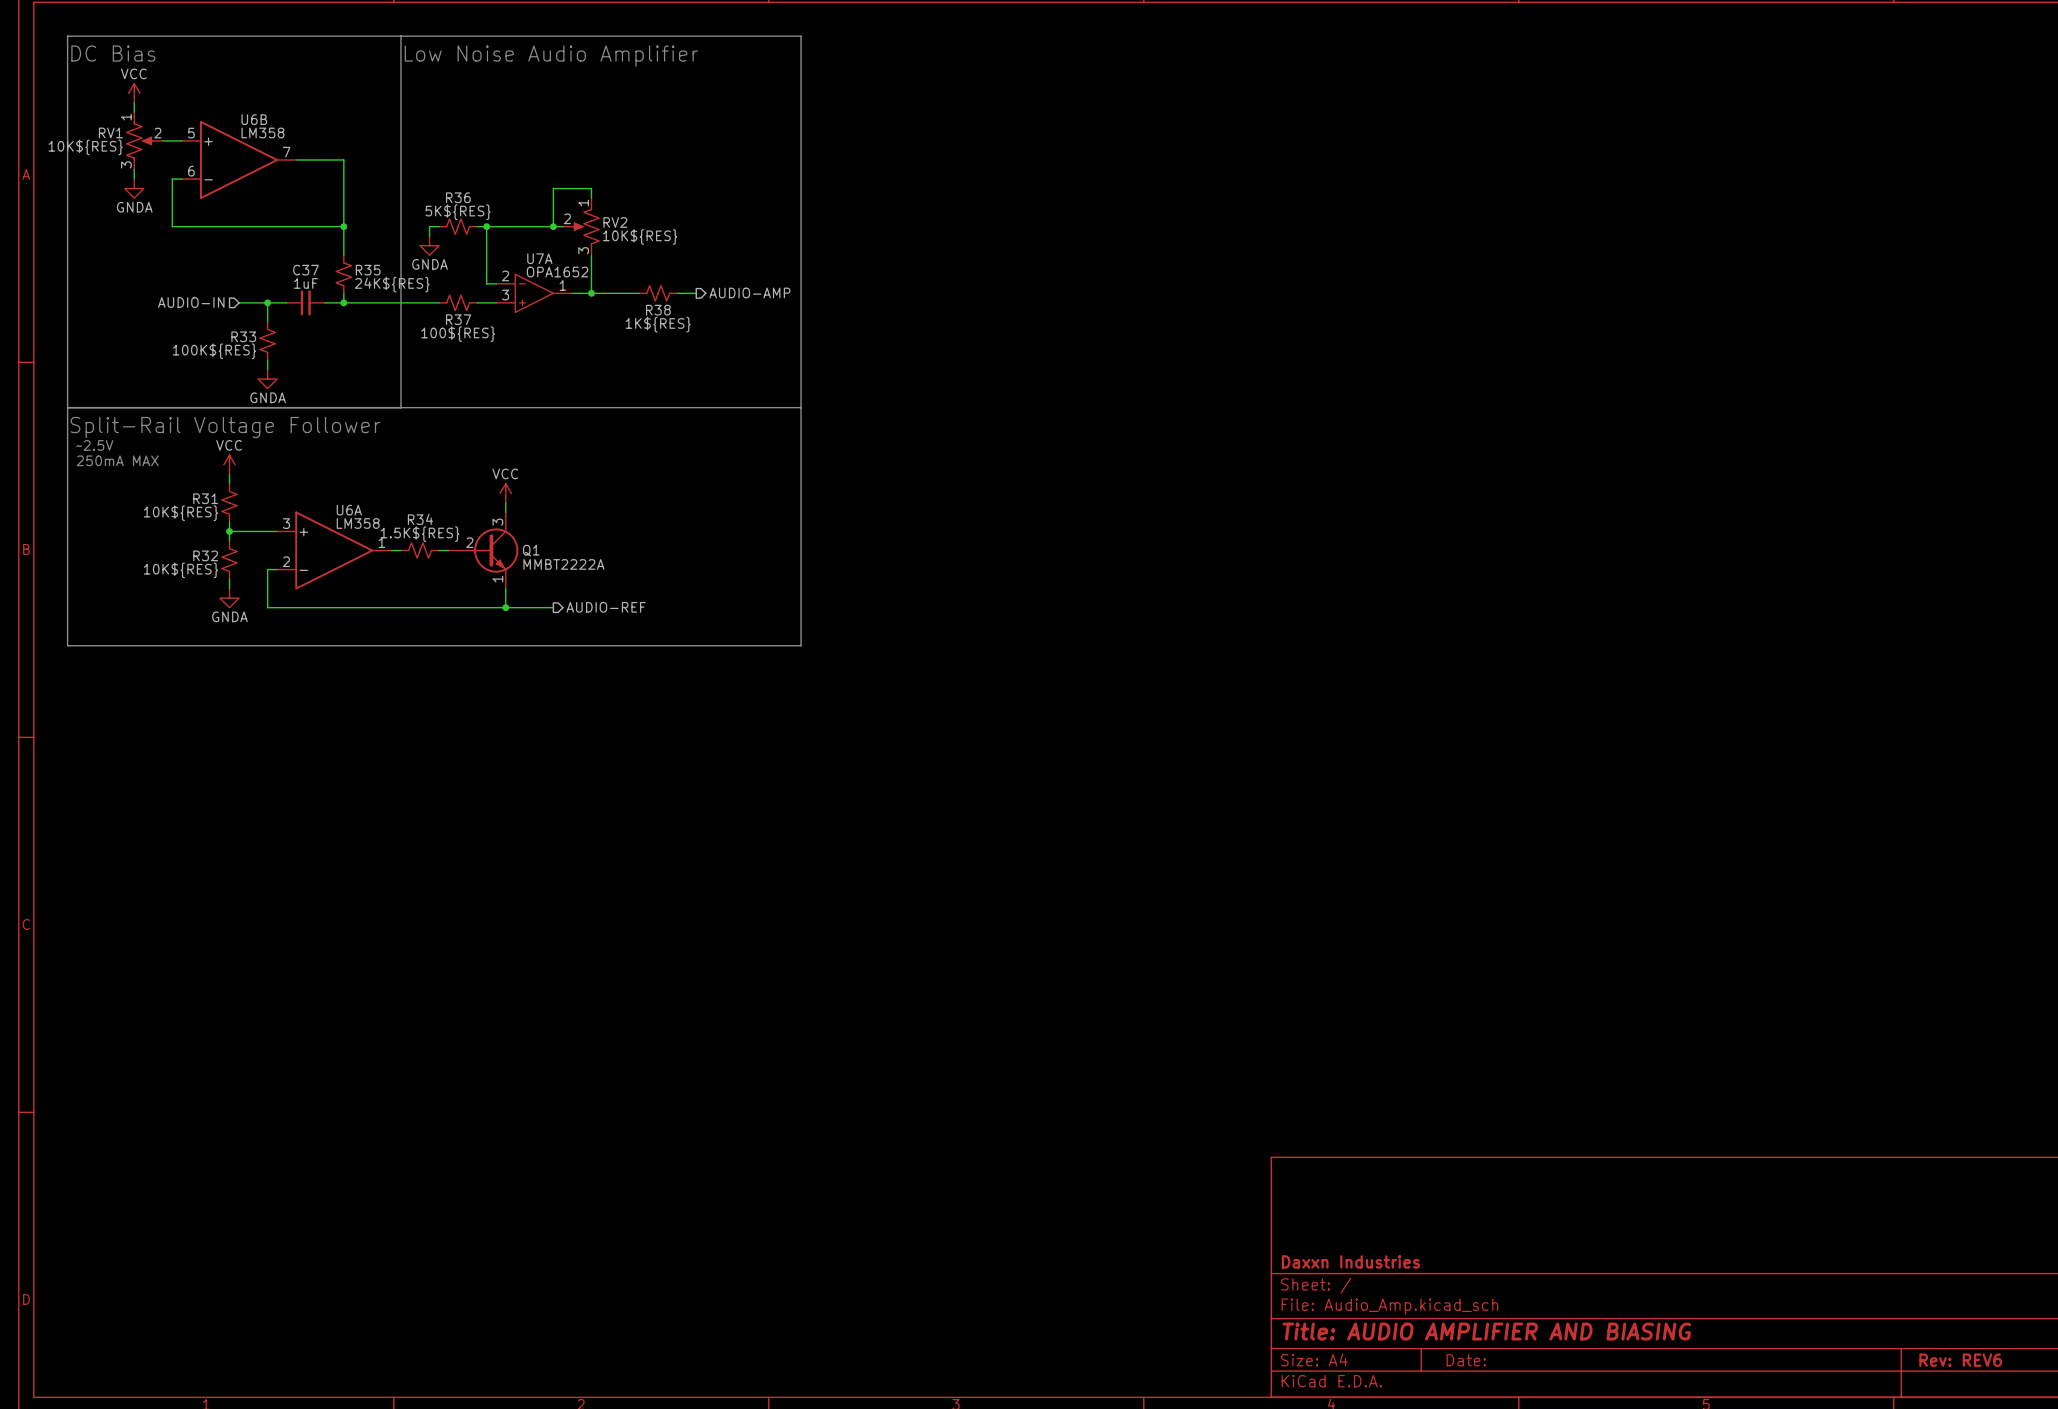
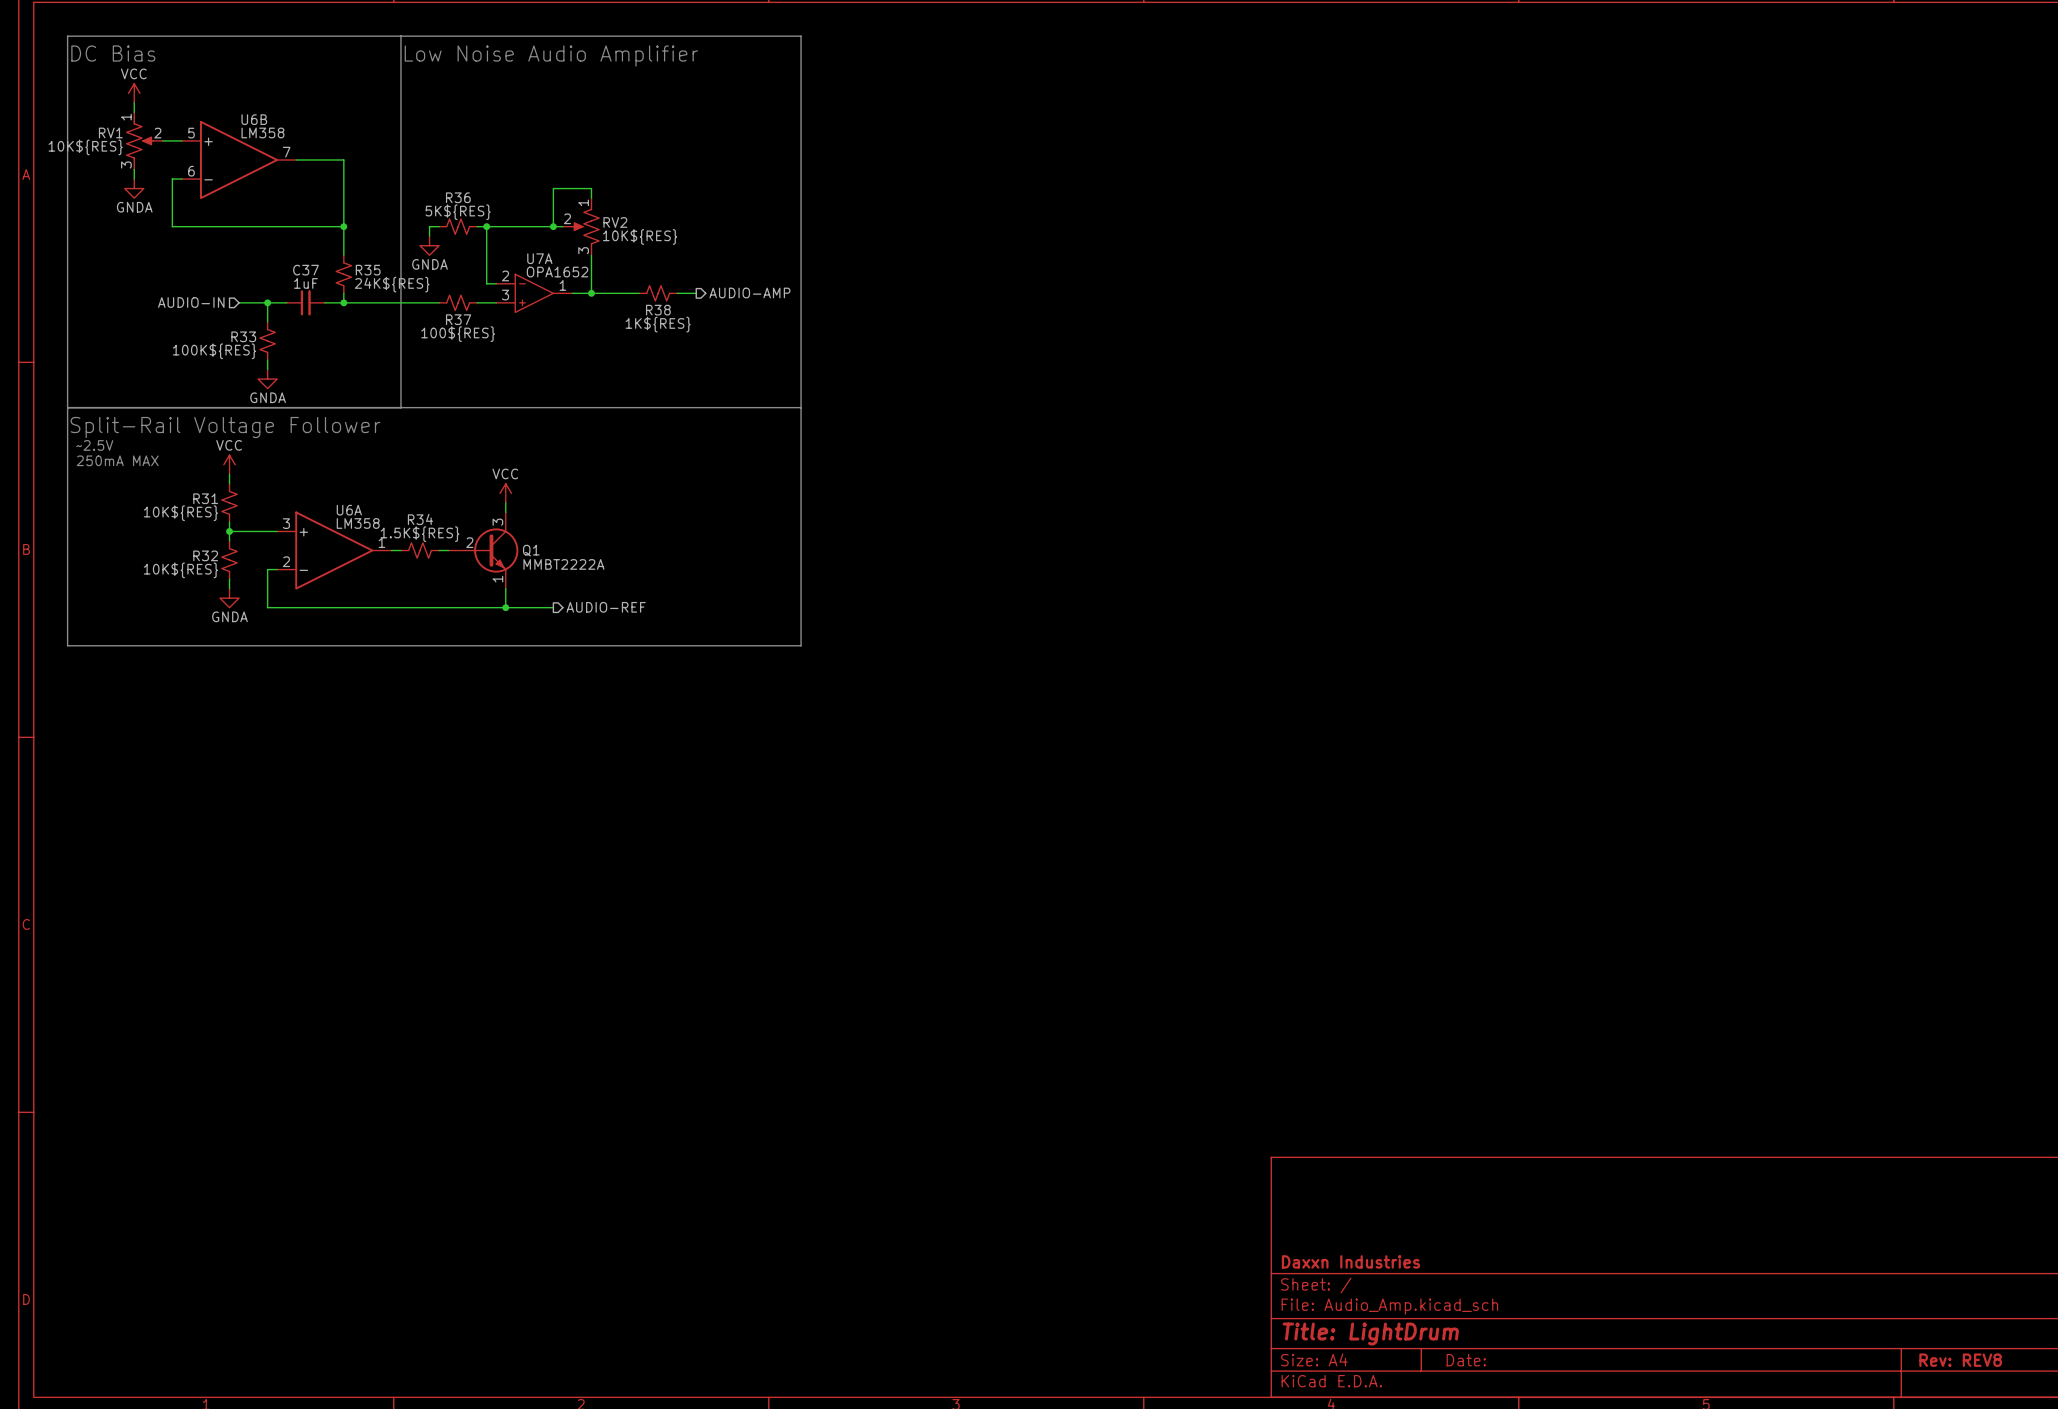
title block: Title: AUDIO AMPLIFIER AND BIASING (1486, 1331) -> Title: LightDrum (1370, 1334)
title block: Rev: REV6 (1960, 1360) -> Rev: REV8 (1960, 1360)

